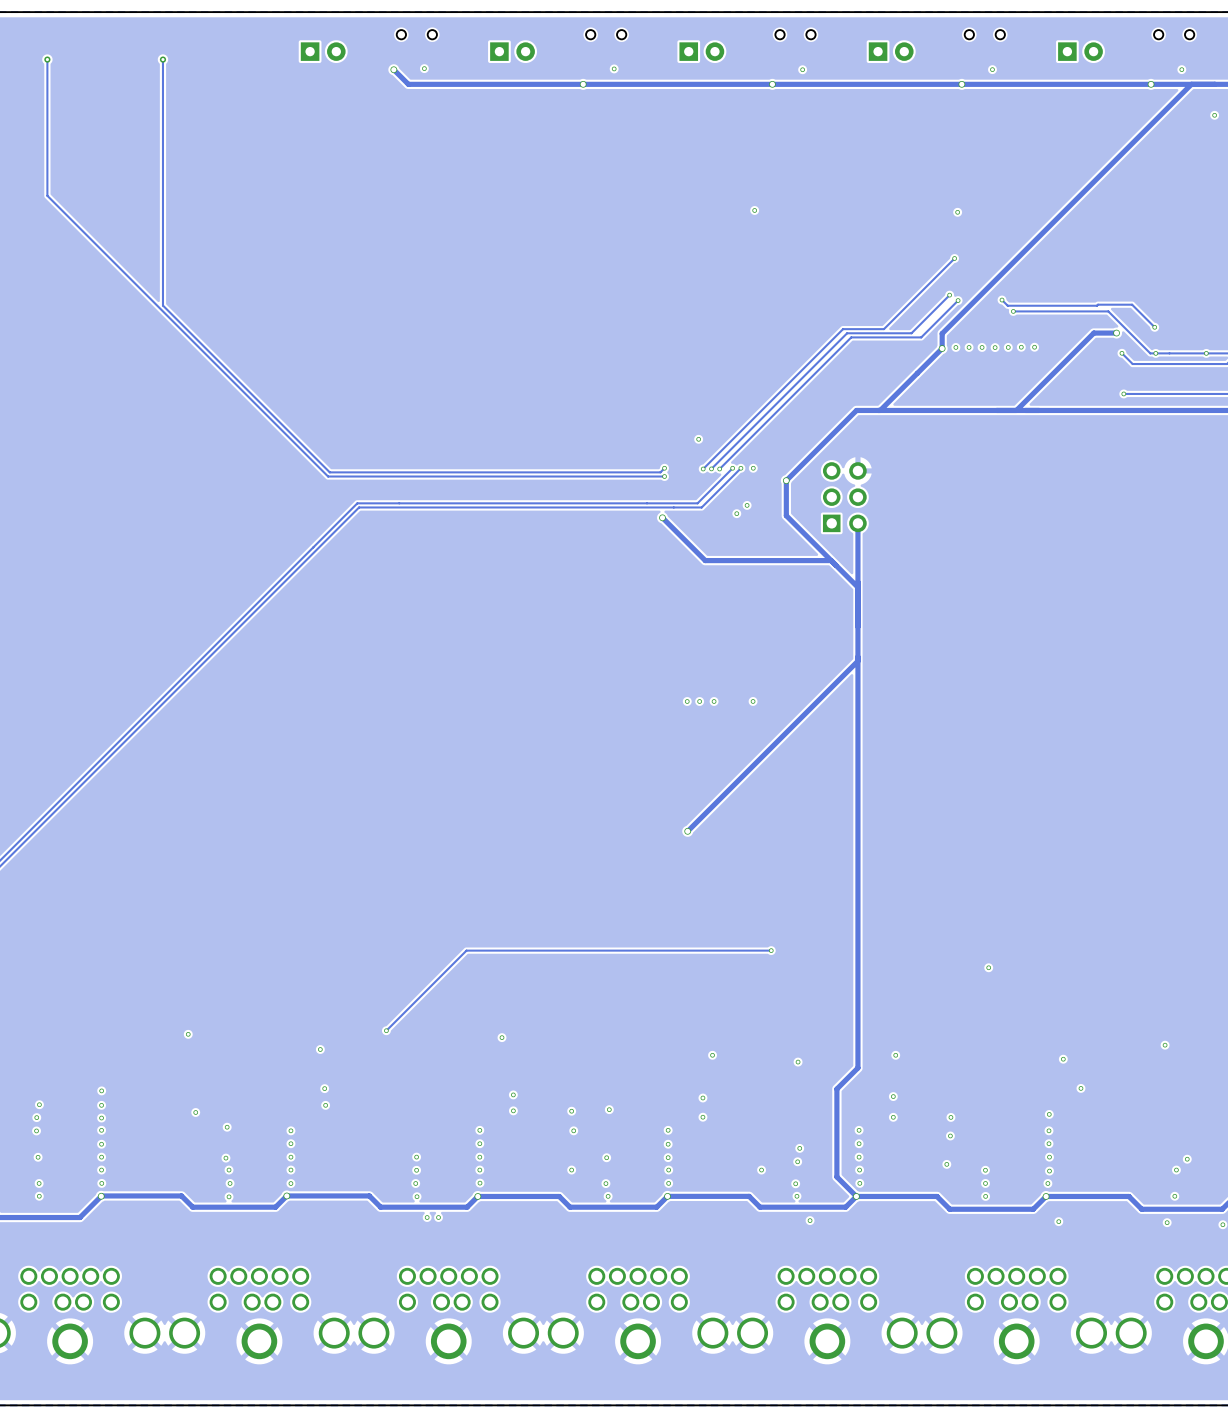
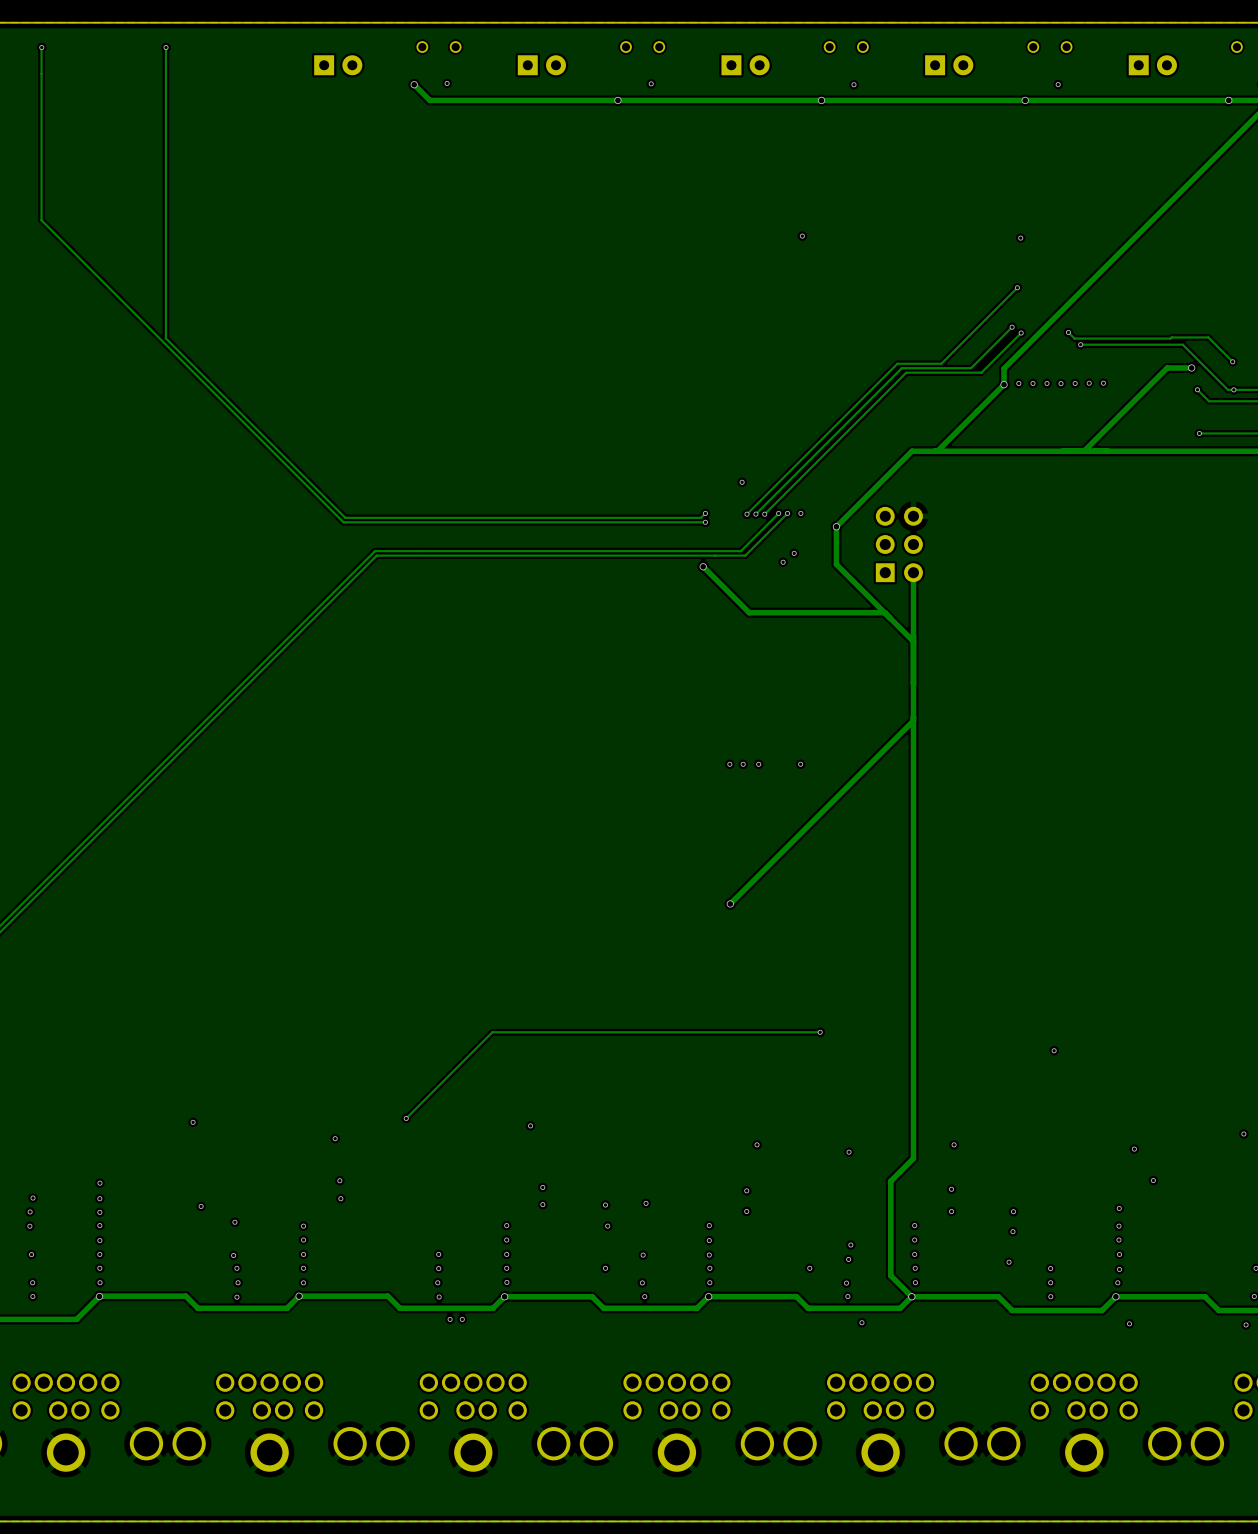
track: none -> (41, 47) (41, 73)
via: none -> (41, 47)
track: none -> (165, 47) (165, 73)
via: none -> (166, 47)
via: (47, 59) -> none
via: (162, 59) -> none

